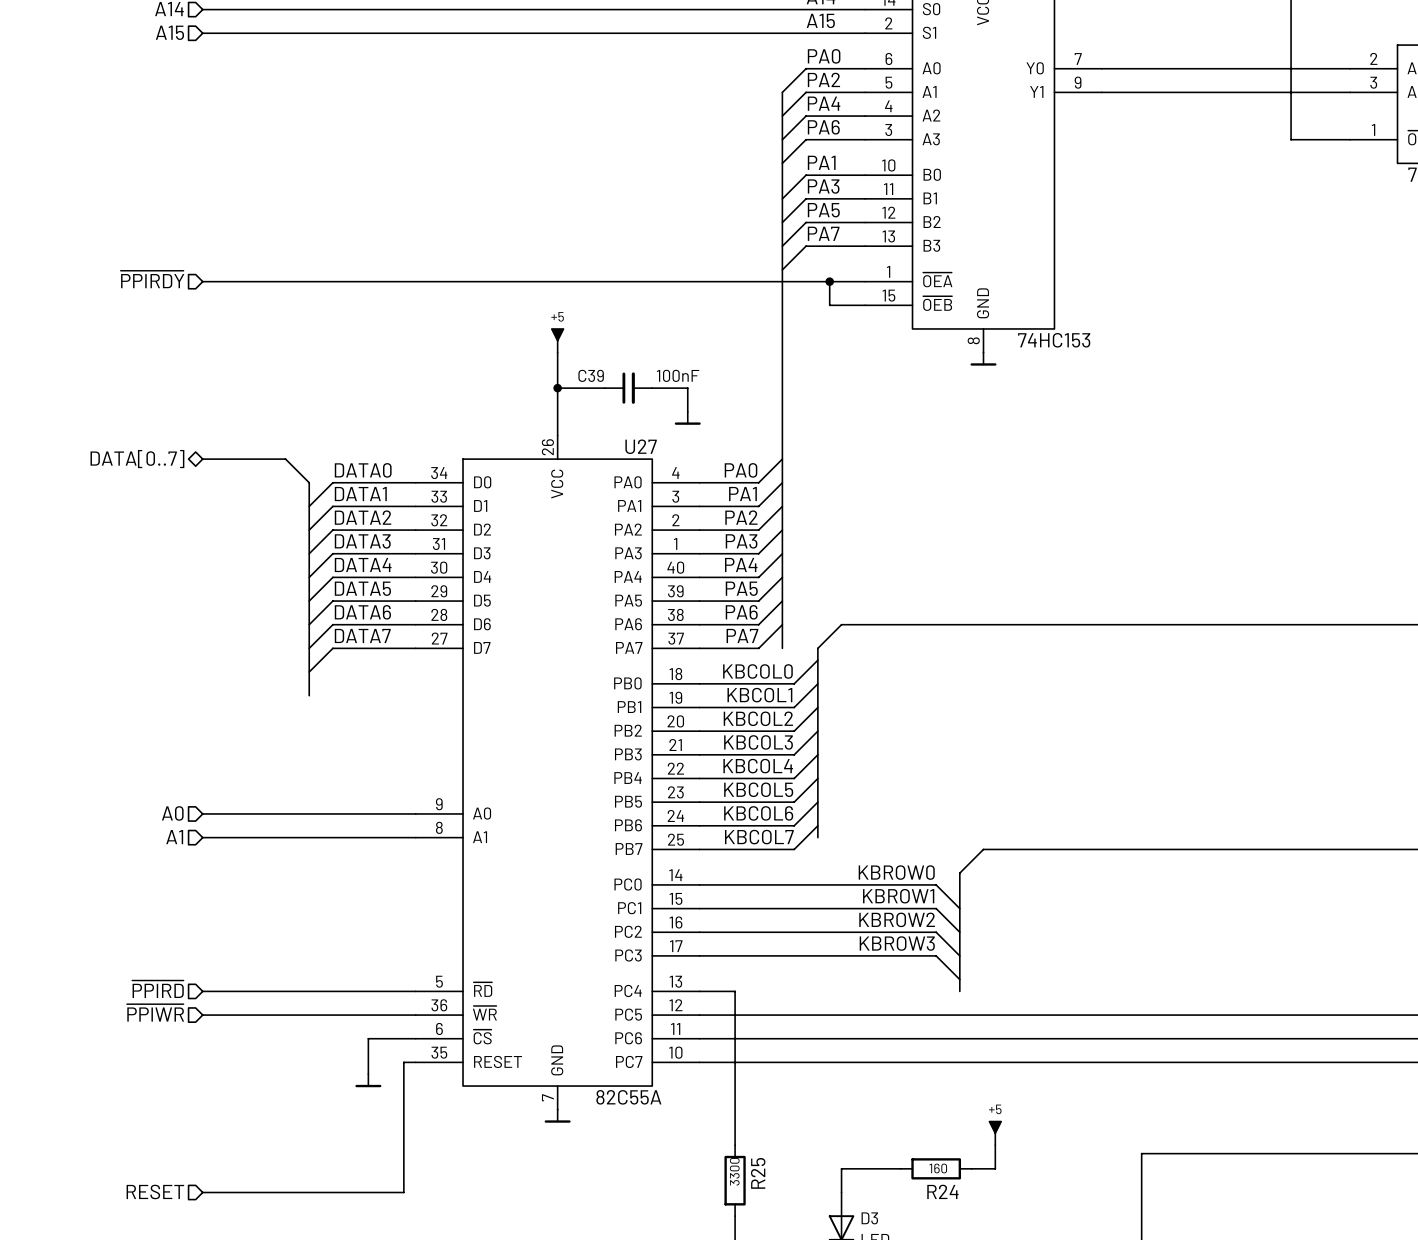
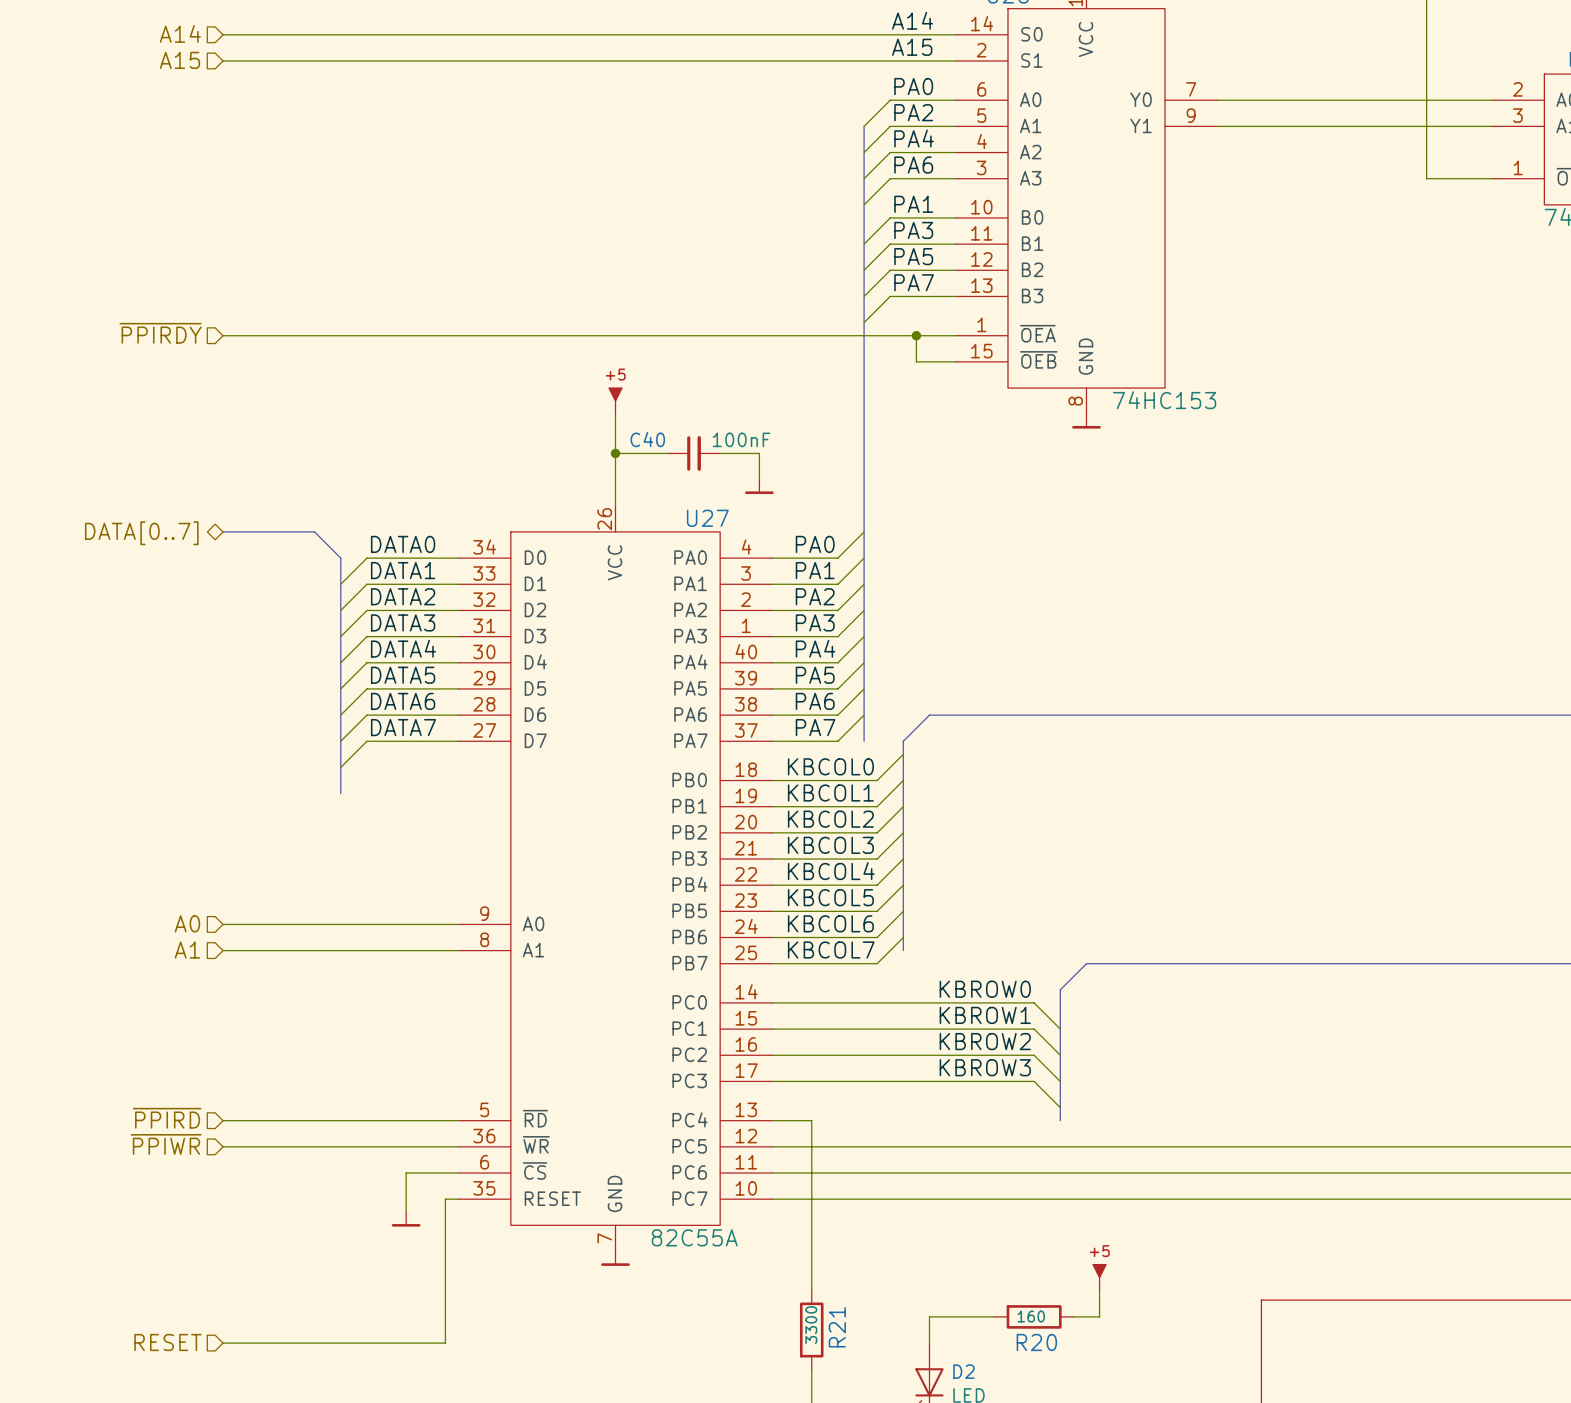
C39 name: C39 (591, 375) -> C40 (647, 439)
R25 name: R25 (758, 1173) -> R21 (837, 1327)
R24 name: R24 (942, 1191) -> R20 (1036, 1342)
D3 name: D3 (869, 1218) -> D2 (964, 1371)

